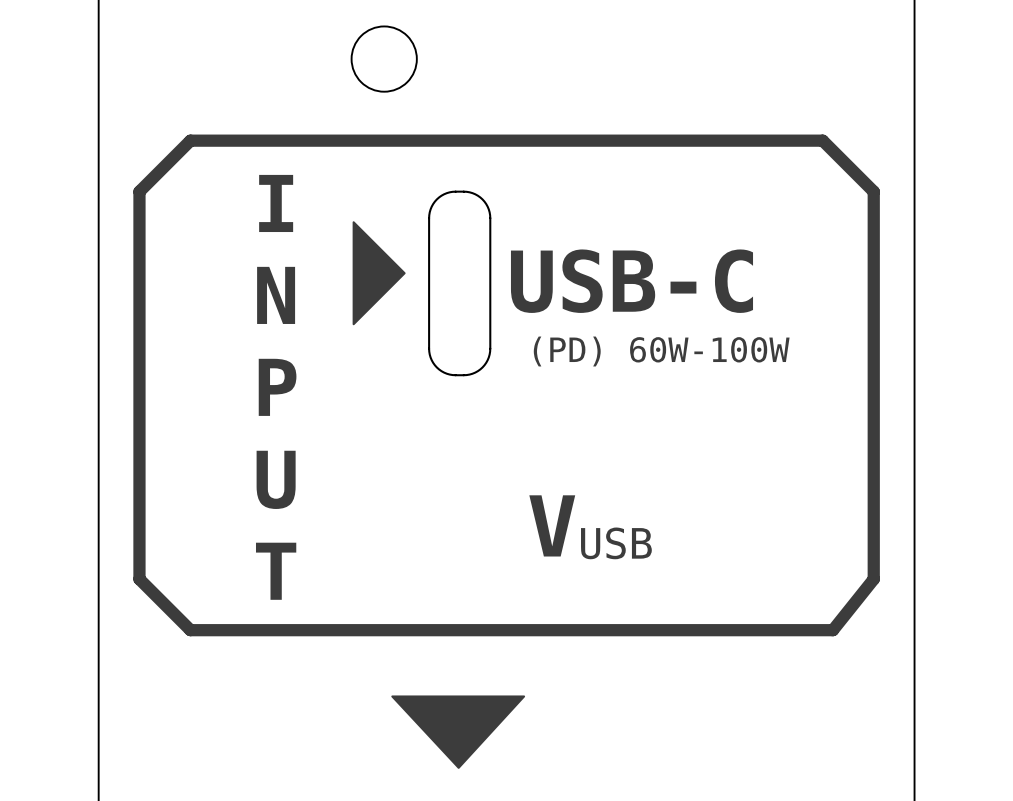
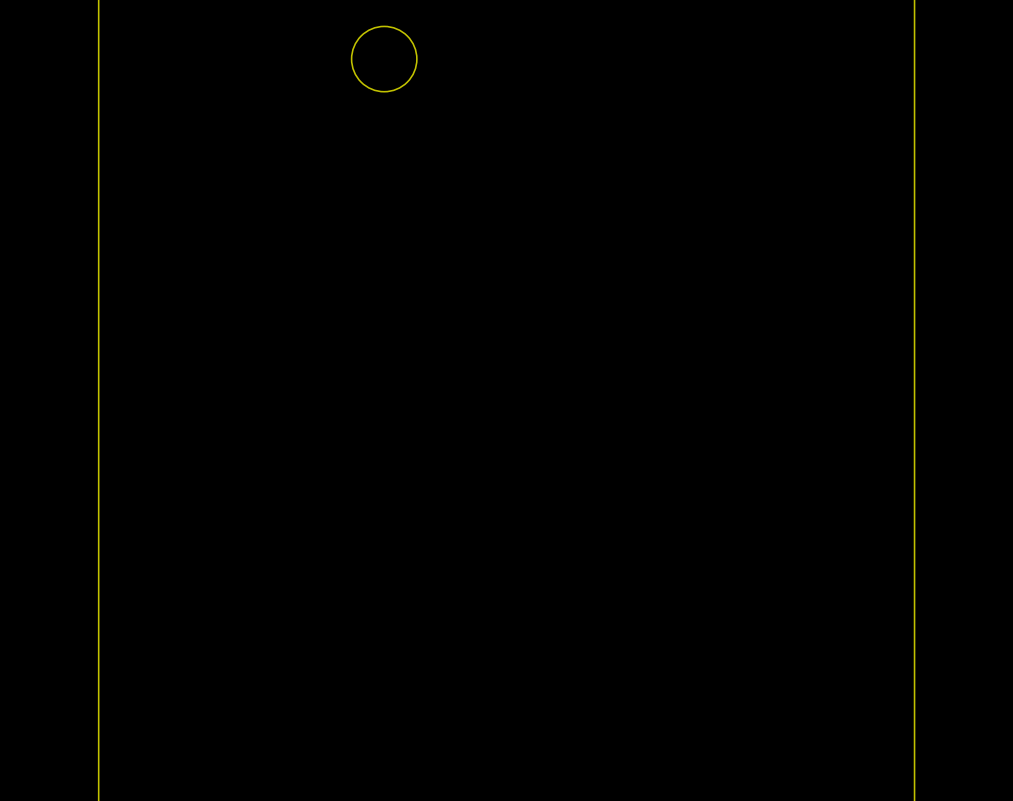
line: (190, 140) (139, 191) (139, 579) (190, 630) (832, 630) (873, 579) (873, 191) (822, 140) (190, 140) -> none
board edge: (455, 191) (469, 192) (480, 197) (487, 206) (490, 218) (490, 351) (482, 367) (475, 372) (463, 375) (449, 374) (439, 369) (431, 360) (429, 348) (429, 215) (433, 204) (439, 197) (455, 191) -> none
text: I (276, 203) -> none
drawing: [352, 221, 406, 326] -> none
text: USB-C (631, 281) -> none
text: N (276, 295) -> none
text: (PD) 60W-100W (661, 351) -> none
text: P (277, 387) -> none
text: U (276, 479) -> none
text: V (552, 525) -> none
text: USB (616, 543) -> none
text: T (276, 571) -> none
drawing: [391, 695, 526, 769] -> none

